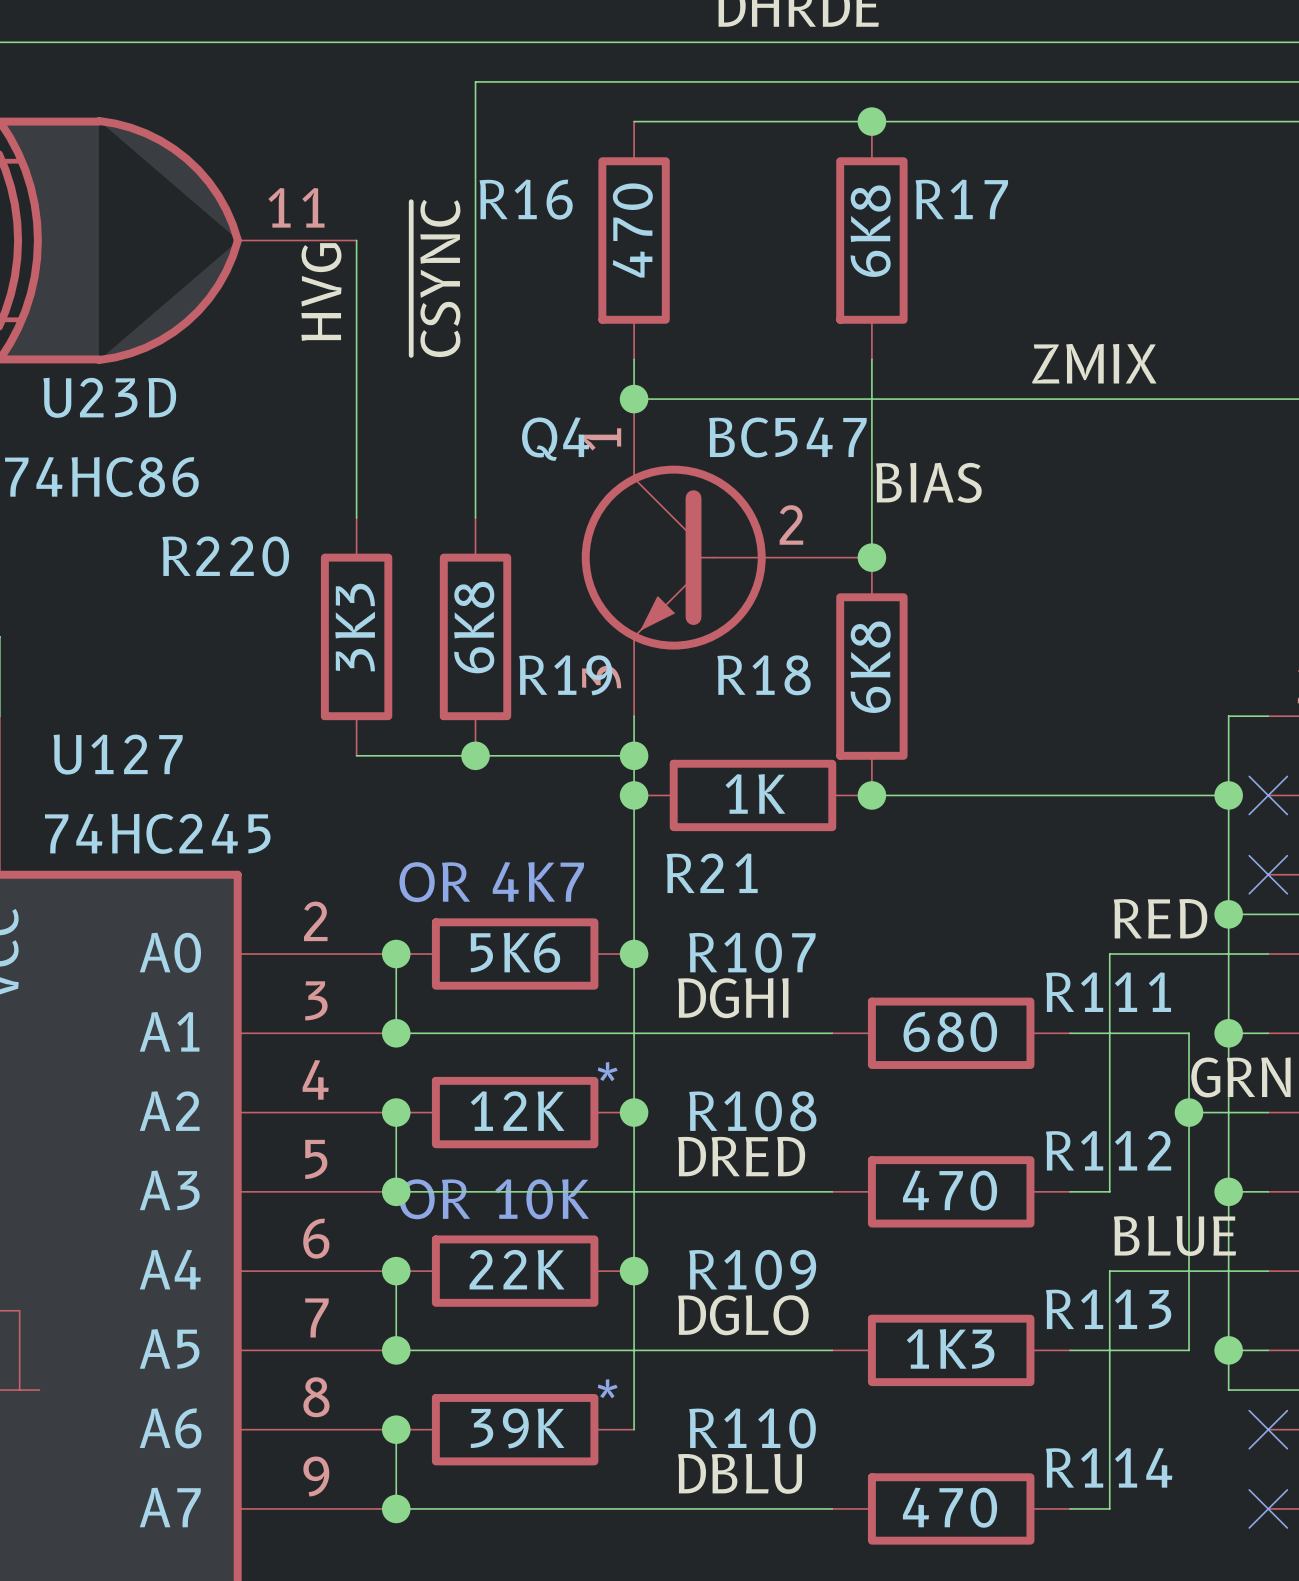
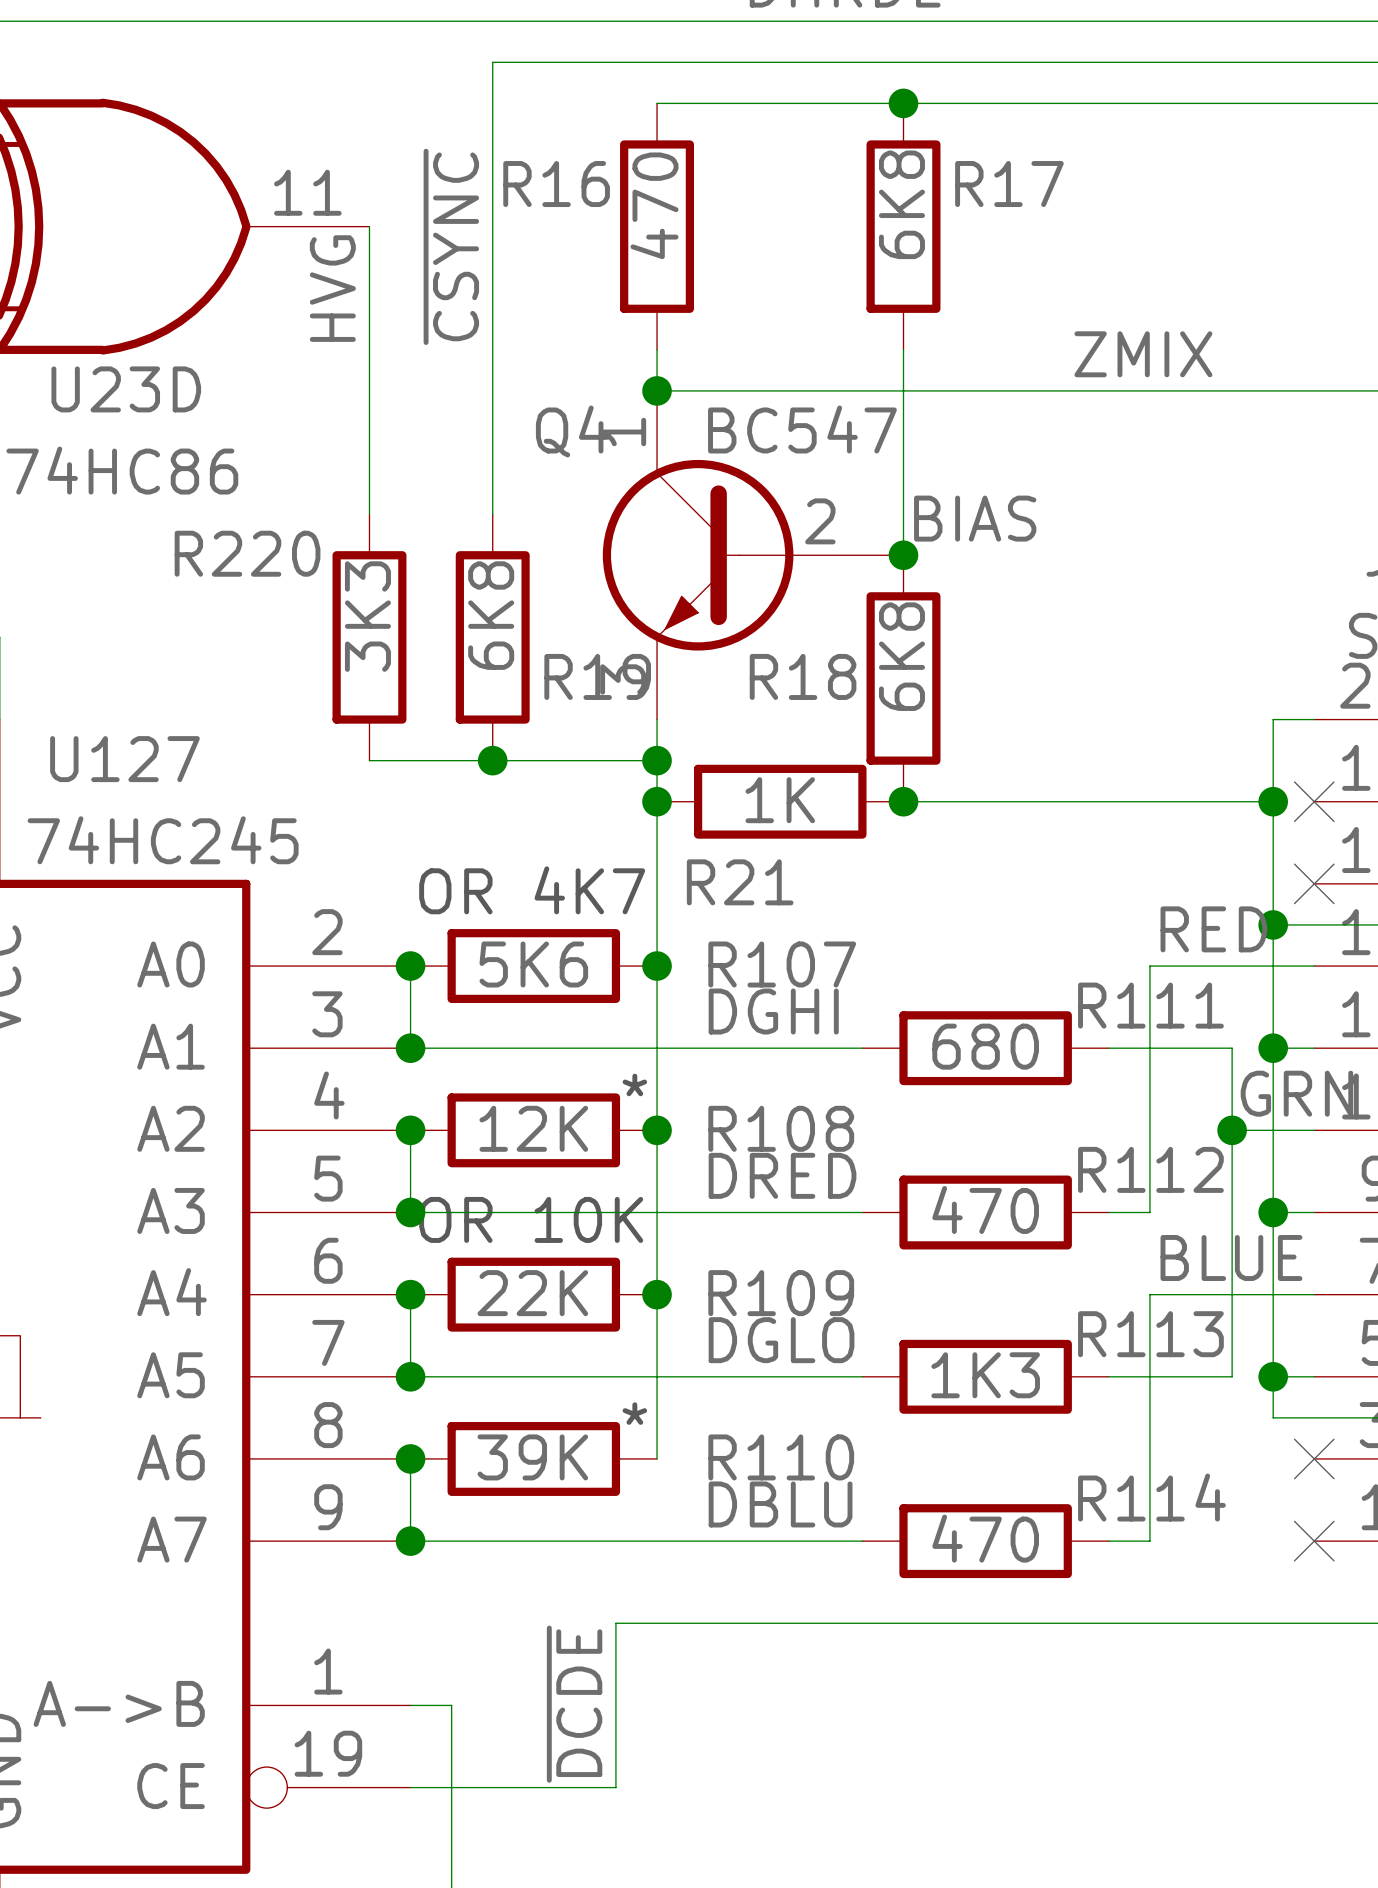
label position: BIAS (928, 482) -> BIAS (975, 518)

